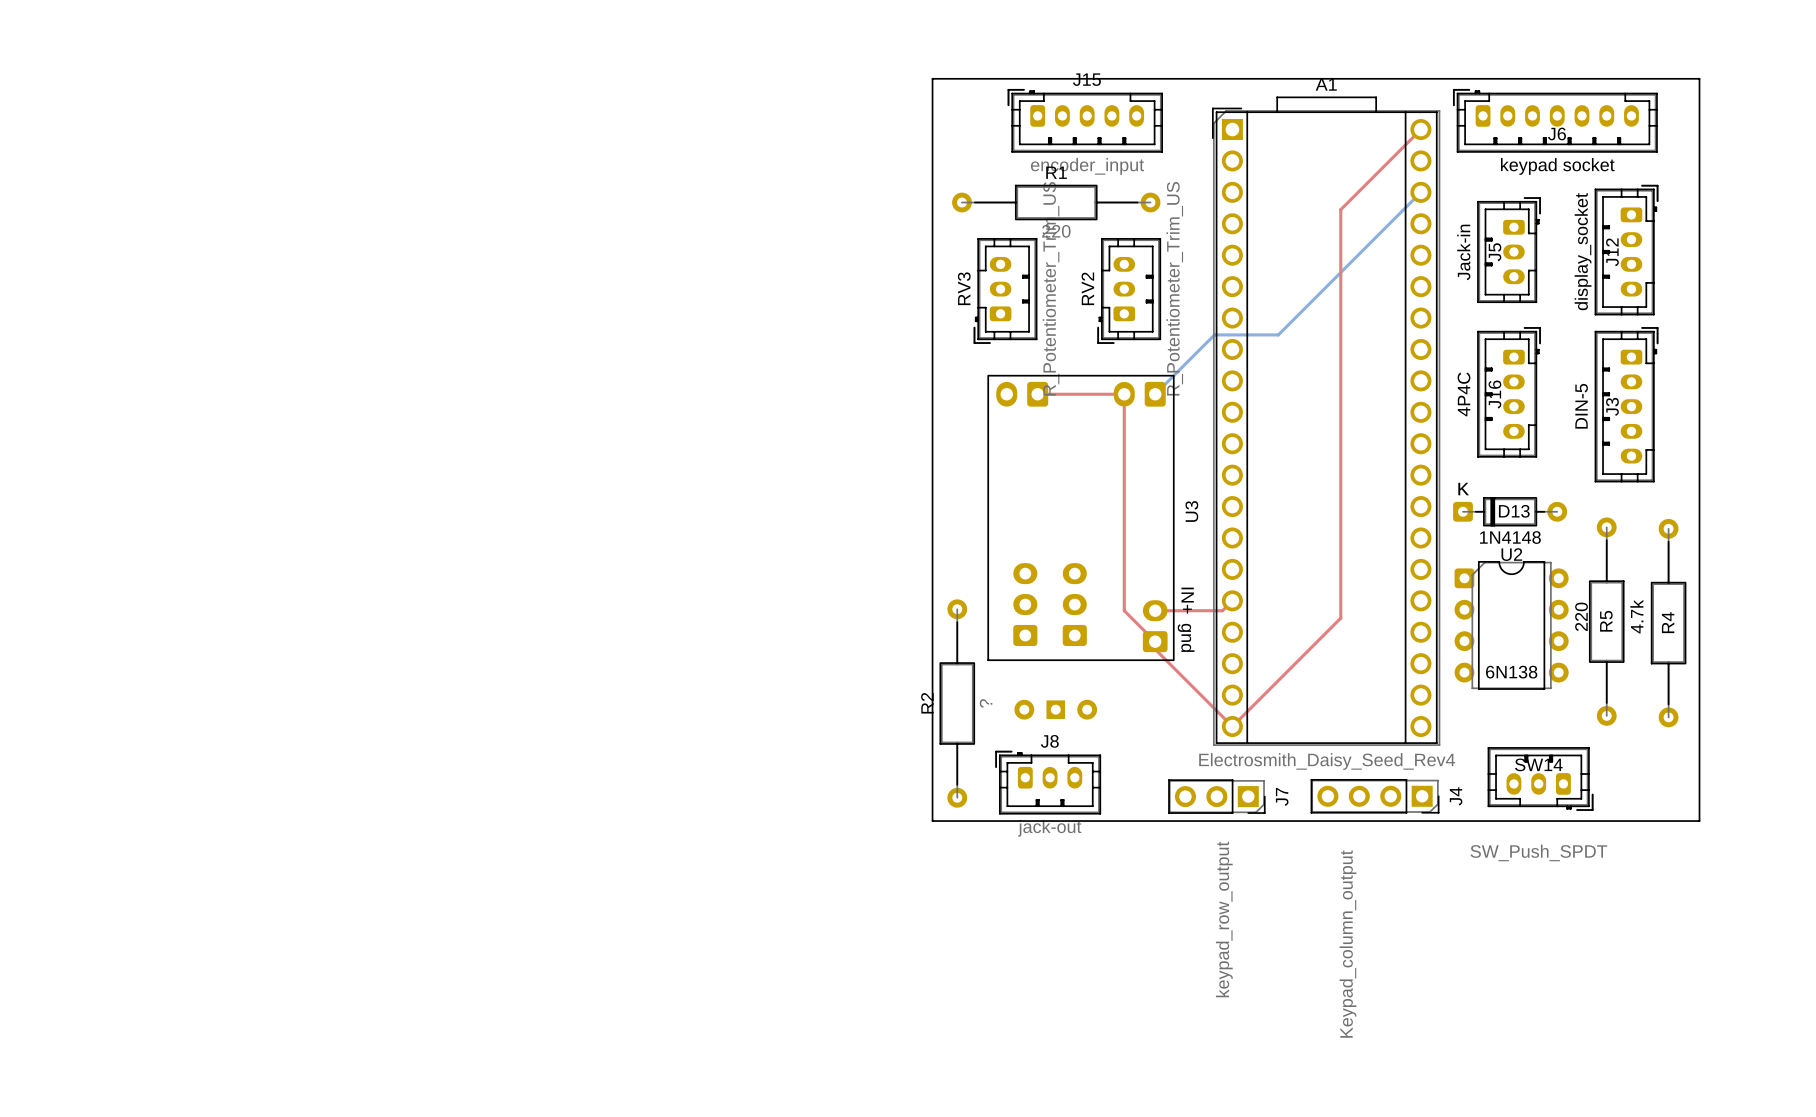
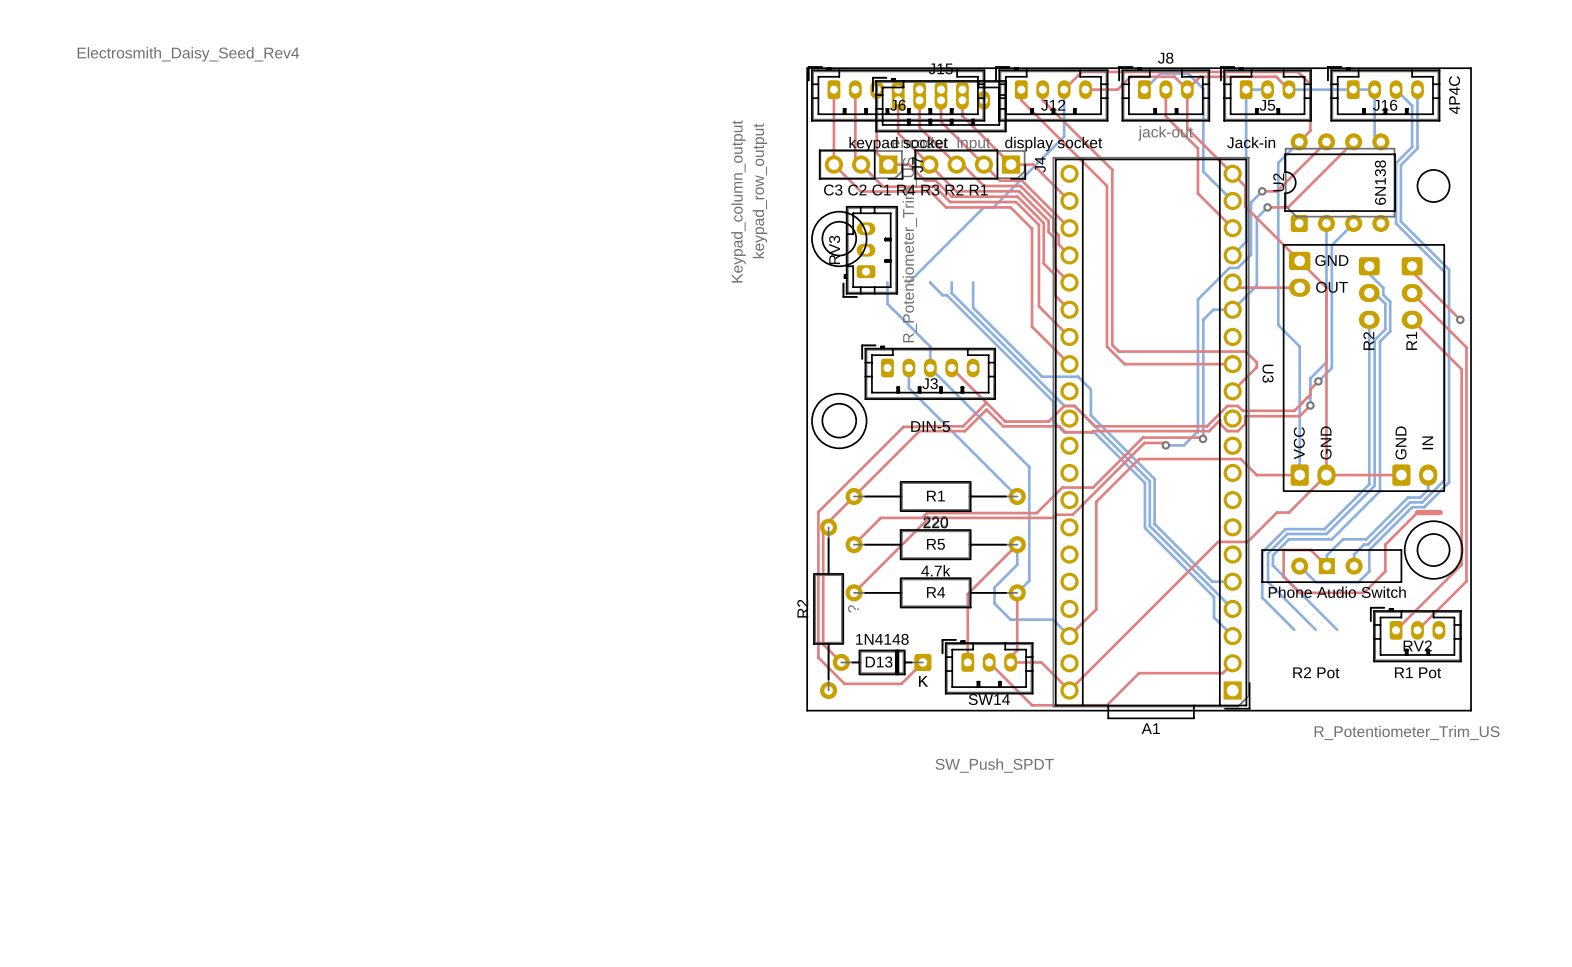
top track: none -> (833, 89) (833, 164) (860, 191) (930, 191) (946, 207) (1010, 207) (1032, 228) (1032, 326) (1069, 364)
top track: none -> (855, 89) (855, 158) (883, 186) (934, 186) (950, 202) (1016, 202) (1038, 224) (1038, 306) (1069, 336)
top track: none -> (876, 89) (876, 153) (888, 164) (908, 164) (924, 180) (935, 180) (951, 196) (1017, 196) (1043, 222) (1043, 263) (1055, 275) (1055, 295) (1069, 309)
top track: none -> (898, 89) (898, 133) (956, 191) (1019, 191) (1048, 220) (1048, 231) (1053, 237) (1054, 267) (1069, 282)
top track: none -> (919, 89) (919, 127) (956, 164) (962, 164) (983, 185) (1020, 185) (1053, 218) (1053, 229) (1058, 235) (1058, 244) (1069, 255)
top track: none -> (941, 89) (941, 121) (999, 180) (1021, 180) (1069, 228)
top track: none -> (962, 89) (962, 115) (1011, 164) (1033, 164) (1069, 200)
top track: none -> (1021, 89) (1021, 100) (1106, 185) (1106, 346) (1124, 364) (1232, 364)
top track: none -> (1042, 89) (1042, 100) (1112, 169) (1112, 345) (1118, 351) (1245, 351) (1256, 362) (1256, 367) (1232, 391)
top track: none -> (1064, 89) (1081, 71) (1298, 71) (1310, 84) (1310, 130) (1299, 141)
bottom track: none -> (1064, 89) (1064, 136) (993, 207) (983, 207) (908, 282)
top track: none -> (1085, 89) (1117, 89) (1130, 76) (1174, 76) (1187, 89)
bottom track: none -> (1144, 89) (1160, 73) (1188, 73) (1203, 88) (1203, 171) (1232, 200)
top track: none -> (1165, 89) (1165, 116) (1197, 148) (1197, 193) (1232, 228)
top track: none -> (1187, 89) (1187, 128) (1245, 186) (1245, 206) (1326, 287) (1326, 475)
top track: none -> (1187, 89) (1200, 76) (1276, 76) (1288, 89)
bottom track: none -> (1267, 89) (1246, 89) (1246, 241) (1232, 255)
bottom track: none -> (1288, 89) (1374, 89) (1374, 135) (1380, 141)
bottom track: none -> (1396, 89) (1412, 105) (1412, 147) (1396, 163) (1396, 223) (1444, 271) (1444, 480) (1422, 502) (1410, 502) (1367, 544) (1363, 544) (1354, 554) (1354, 566)
bottom track: none -> (1417, 89) (1417, 148) (1400, 165) (1400, 221) (1449, 269) (1449, 482) (1424, 507) (1412, 507) (1369, 550) (1369, 571) (1358, 582) (1315, 582) (1299, 566)
J6 position: (1555, 120) -> (896, 93)
top track: (1420, 129) (1340, 209) (1340, 618) (1232, 726) (1155, 649) (1155, 641) (1124, 610) (1124, 394) (1037, 394) -> none
bottom track: none -> (1299, 141) (1278, 162) (1278, 325) (1299, 346) (1299, 475)
top track: none -> (1326, 141) (1277, 191) (1262, 191)
top track: none -> (1353, 141) (1288, 207) (1267, 207)
J6 value position: keypad socket (1557, 166) -> keypad socket (898, 144)
R1 name position: R1 (1056, 172) -> R1 (935, 496)
bottom track: (1420, 192) (1278, 334) (1214, 334) (1155, 394) -> none
round board edge: none -> [1416, 169, 1451, 203]
R1 position: (1056, 202) -> (935, 496)
text: none -> C3 C2 C1 R4 R3 R2 R1 (905, 190)
bottom track: none -> (1262, 191) (1250, 202) (1250, 254) (1237, 267) (1229, 267) (1197, 299) (1197, 431) (1183, 445) (1165, 445)
via: none -> (1262, 191)
bottom track: none -> (1267, 207) (1256, 218) (1256, 285) (1232, 309) (1213, 309) (1203, 319) (1202, 438)
via: none -> (1267, 207)
drawing: none -> [811, 210, 868, 268]
J5 rotation: 0° (1509, 250) -> 90° counterclockwise (1265, 93)
J5 position: (1509, 250) -> (1265, 93)
J12 rotation: 0° (1626, 250) -> 90° counterclockwise (1051, 93)
J12 position: (1626, 250) -> (1051, 93)
J12 value: display_socket (1583, 251) -> display socket (1053, 144)
round board edge: none -> [821, 221, 857, 257]
bottom track: none -> (1326, 223) (1326, 362) (1310, 378) (1310, 405)
bottom track: none -> (1353, 223) (1331, 245) (1331, 368) (1318, 381)
RV2 name position: RV2 (1087, 288) -> RV2 (1417, 645)
RV2 value position: R_Potentiometer_Trim_US (1174, 288) -> R_Potentiometer_Trim_US (1407, 732)
RV2 rotation: 0° (1129, 290) -> 90° clockwise (1415, 634)
RV2 position: (1129, 290) -> (1415, 634)
text: none -> GND (1331, 260)
bottom track: none -> (1369, 266) (1369, 273) (1383, 287) (1383, 294) (1390, 301) (1390, 331) (1380, 341) (1380, 491) (1331, 539) (1288, 539) (1272, 555) (1272, 565) (1337, 629)
top track: none -> (1412, 266) (1412, 271) (1460, 319)
bottom track: none -> (887, 282) (887, 303) (930, 346) (930, 368) (1029, 467) (1029, 580) (1017, 592)
bottom track: none -> (930, 282) (942, 295) (946, 295) (1053, 401) (1053, 421) (1064, 432) (1094, 432) (1144, 483) (1144, 528) (1214, 597) (1214, 617) (1232, 636)
bottom track: none -> (951, 282) (951, 293) (1064, 405) (1074, 405) (1149, 481) (1149, 526) (1232, 608)
bottom track: none -> (973, 282) (973, 307) (1042, 376) (1078, 376) (1090, 389) (1090, 415) (1154, 479) (1154, 524) (1212, 581) (1232, 581)
top track: none -> (1232, 282) (1237, 287) (1299, 287)
text: none -> OUT (1332, 287)
bottom track: none -> (1369, 293) (1374, 293) (1385, 303) (1385, 329) (1374, 340) (1374, 485) (1326, 533) (1287, 533) (1268, 553) (1268, 582) (1315, 629)
top track: none -> (1412, 293) (1466, 347) (1466, 581) (1417, 630)
bottom track: none -> (1369, 319) (1369, 484) (1324, 529) (1285, 529) (1262, 552) (1262, 597) (1294, 629)
top track: none -> (1412, 319) (1461, 369) (1461, 564) (1396, 630)
via: none -> (1460, 319)
J16 rotation: 0° (1509, 392) -> 90° counterclockwise (1383, 93)
J16 position: (1509, 392) -> (1383, 93)
text: none -> R2 (1368, 340)
text: none -> R1 (1411, 340)
J16 value position: 4P4C (1464, 394) -> 4P4C (1454, 95)
J3 rotation: 0° (1626, 404) -> 90° counterclockwise (928, 372)
J3 position: (1626, 404) -> (928, 372)
A1 rotation: 0° (1326, 421) -> 180° (1151, 438)
bottom track: none -> (908, 368) (908, 388) (1017, 496)
top track: none -> (951, 368) (1005, 421) (1048, 421) (1064, 405) (1074, 405) (1095, 426) (1207, 426) (1227, 405) (1237, 405) (1242, 410) (1294, 410) (1310, 394) (1310, 389) (1318, 381)
via: none -> (1318, 381)
drawing: none -> [811, 392, 868, 450]
round board edge: none -> [821, 403, 857, 439]
top track: none -> (986, 402) (963, 426) (903, 426) (818, 512) (818, 657) (844, 683) (901, 683) (922, 662)
top track: none -> (1310, 405) (1299, 416) (1245, 416) (1245, 423) (1237, 431) (1227, 431) (1220, 423) (1220, 420) (1209, 431) (1065, 432) (1059, 426) (1003, 426) (986, 409) (965, 431) (919, 431) (823, 527) (823, 644) (841, 662)
via: none -> (1310, 405)
top track: none -> (1202, 438) (1142, 437) (1093, 487) (1062, 487) (1036, 513) (927, 513) (922, 517) (880, 517) (854, 544)
via: none -> (1202, 438)
D13 rotation: 0° (1510, 511) -> 180° (882, 662)
D13 position: (1510, 511) -> (882, 662)
text: none -> GND (1326, 442)
text: none -> GND (1401, 442)
text: none -> IN (1427, 442)
text: none -> VCC (1299, 443)
top track: none -> (1165, 445) (1163, 442) (1144, 442) (1072, 514) (1056, 514) (1053, 517) (929, 517) (854, 592)
via: none -> (1165, 445)
U3 rotation: 0° (1080, 517) -> 180° (1363, 368)
U3 position: (1080, 517) -> (1363, 368)
top track: none -> (1299, 475) (1256, 475) (1240, 459) (1139, 459) (1096, 501) (1096, 609) (1069, 636)
top track: none -> (1326, 475) (1288, 512) (1277, 512) (1247, 541) (1218, 541) (1069, 690) (1041, 662) (1010, 662) (1010, 657) (1017, 650) (1017, 592)
top track: none -> (1326, 475) (1401, 475)
bottom track: none -> (1428, 475) (1428, 489) (1420, 497) (1408, 497) (1366, 539) (1342, 539) (1326, 555) (1326, 566)
top track: none -> (1440, 512) (1417, 512) (1385, 544) (1385, 571) (1363, 592) (1299, 592) (1283, 576) (1283, 550) (1310, 550) (1326, 566)
text: IN+ (1187, 600) -> none
top track: (1232, 600) (1222, 610) (1155, 610) -> none
drawing: none -> [1403, 520, 1464, 580]
round board edge: none -> [1416, 533, 1451, 567]
R5 rotation: 0° (1606, 621) -> 90° clockwise (935, 544)
R5 position: (1606, 621) -> (935, 544)
R4 rotation: 0° (1668, 623) -> 90° clockwise (935, 592)
R4 position: (1668, 623) -> (935, 592)
U2 rotation: 0° (1511, 625) -> 90° counterclockwise (1340, 182)
U2 position: (1511, 625) -> (1340, 182)
top track: none -> (1017, 544) (967, 594) (967, 662)
bottom track: none -> (1017, 544) (1017, 564) (994, 587) (994, 603) (1010, 619) (1053, 619) (1069, 636)
line: none -> (1262, 550) (1401, 550) (1401, 582) (1262, 582) (1262, 550)
text: gnd (1186, 637) -> none
part: none -> (1326, 566)
text: none -> Phone Audio Switch (1337, 592)
part: (1055, 709) -> none
A1 value position: Electrosmith_Daisy_Seed_Rev4 (1327, 761) -> Electrosmith_Daisy_Seed_Rev4 (188, 54)
SW14 name position: SW14 (1538, 764) -> SW14 (989, 699)
top track: none -> (989, 662) (1032, 705) (1106, 705) (1139, 673) (1222, 673) (1232, 663)
text: none -> R2 Pot (1316, 672)
text: none -> R1 Pot (1418, 672)
SW14 rotation: 0° (1540, 778) -> 180° (987, 666)
SW14 position: (1540, 778) -> (987, 666)
J8 position: (1048, 782) -> (1164, 93)
J7 position: (1216, 796) -> (861, 164)
J4 position: (1375, 796) -> (970, 164)
SW14 value position: SW_Push_SPDT (1538, 852) -> SW_Push_SPDT (994, 765)
J7 value position: keypad_row_output (1224, 919) -> keypad_row_output (759, 190)
J4 value position: Keypad_column_output (1348, 944) -> Keypad_column_output (738, 201)

